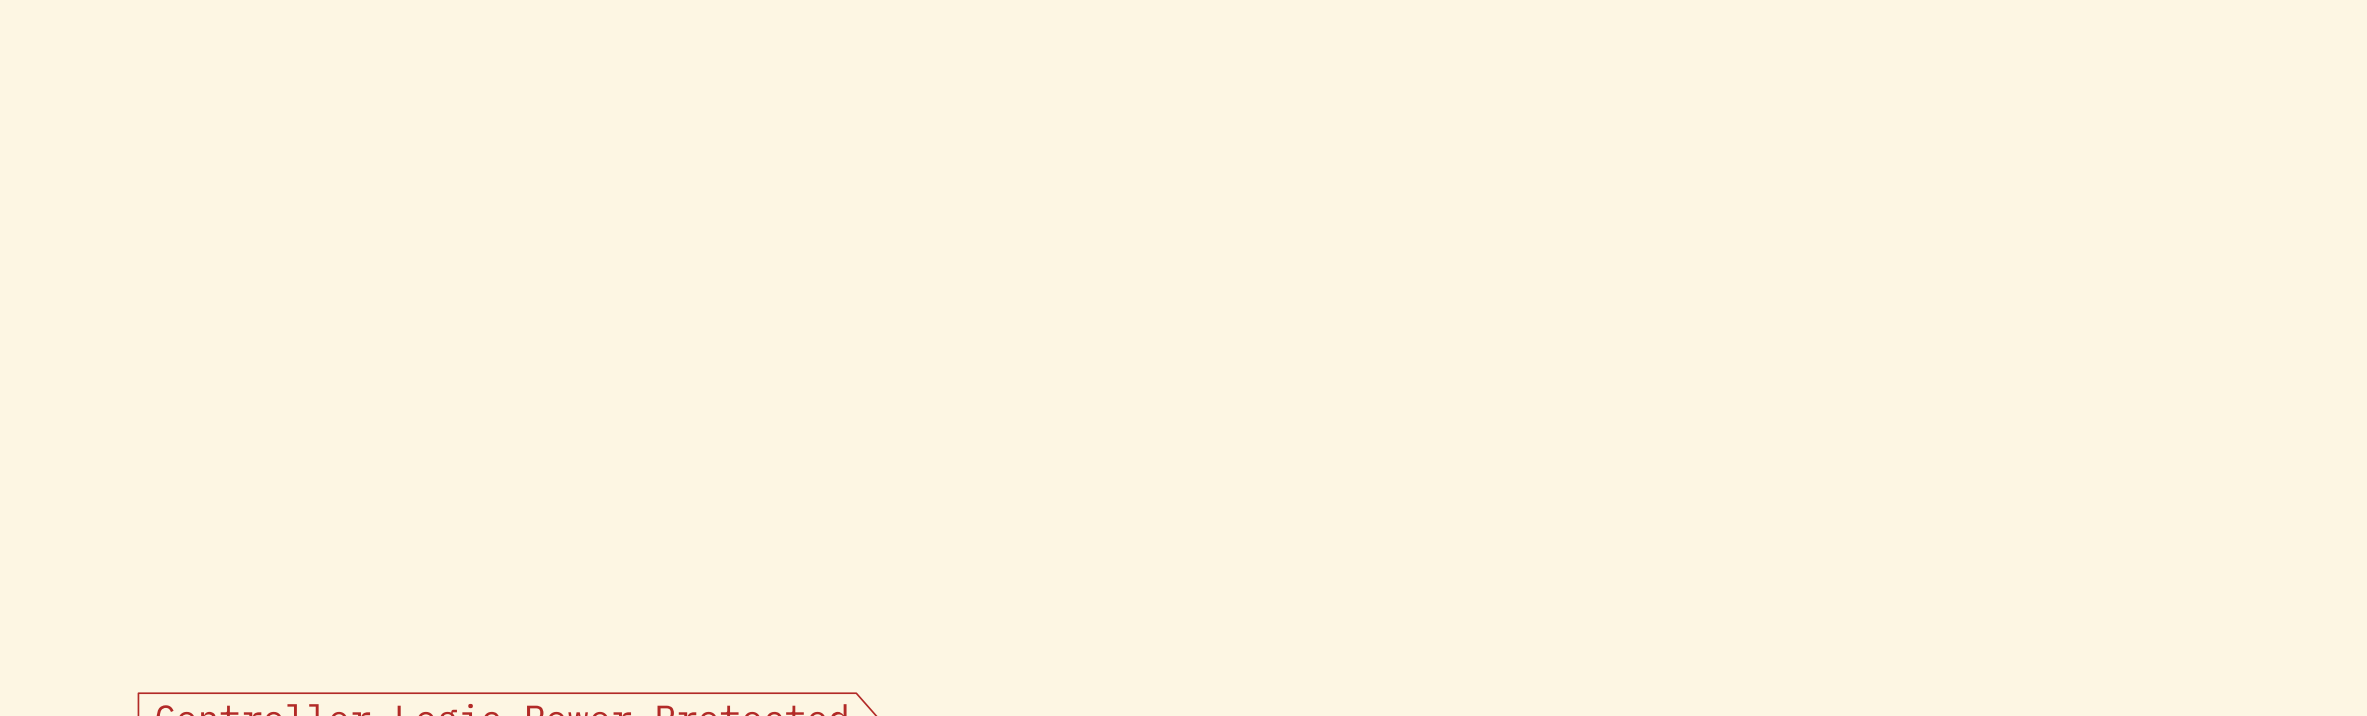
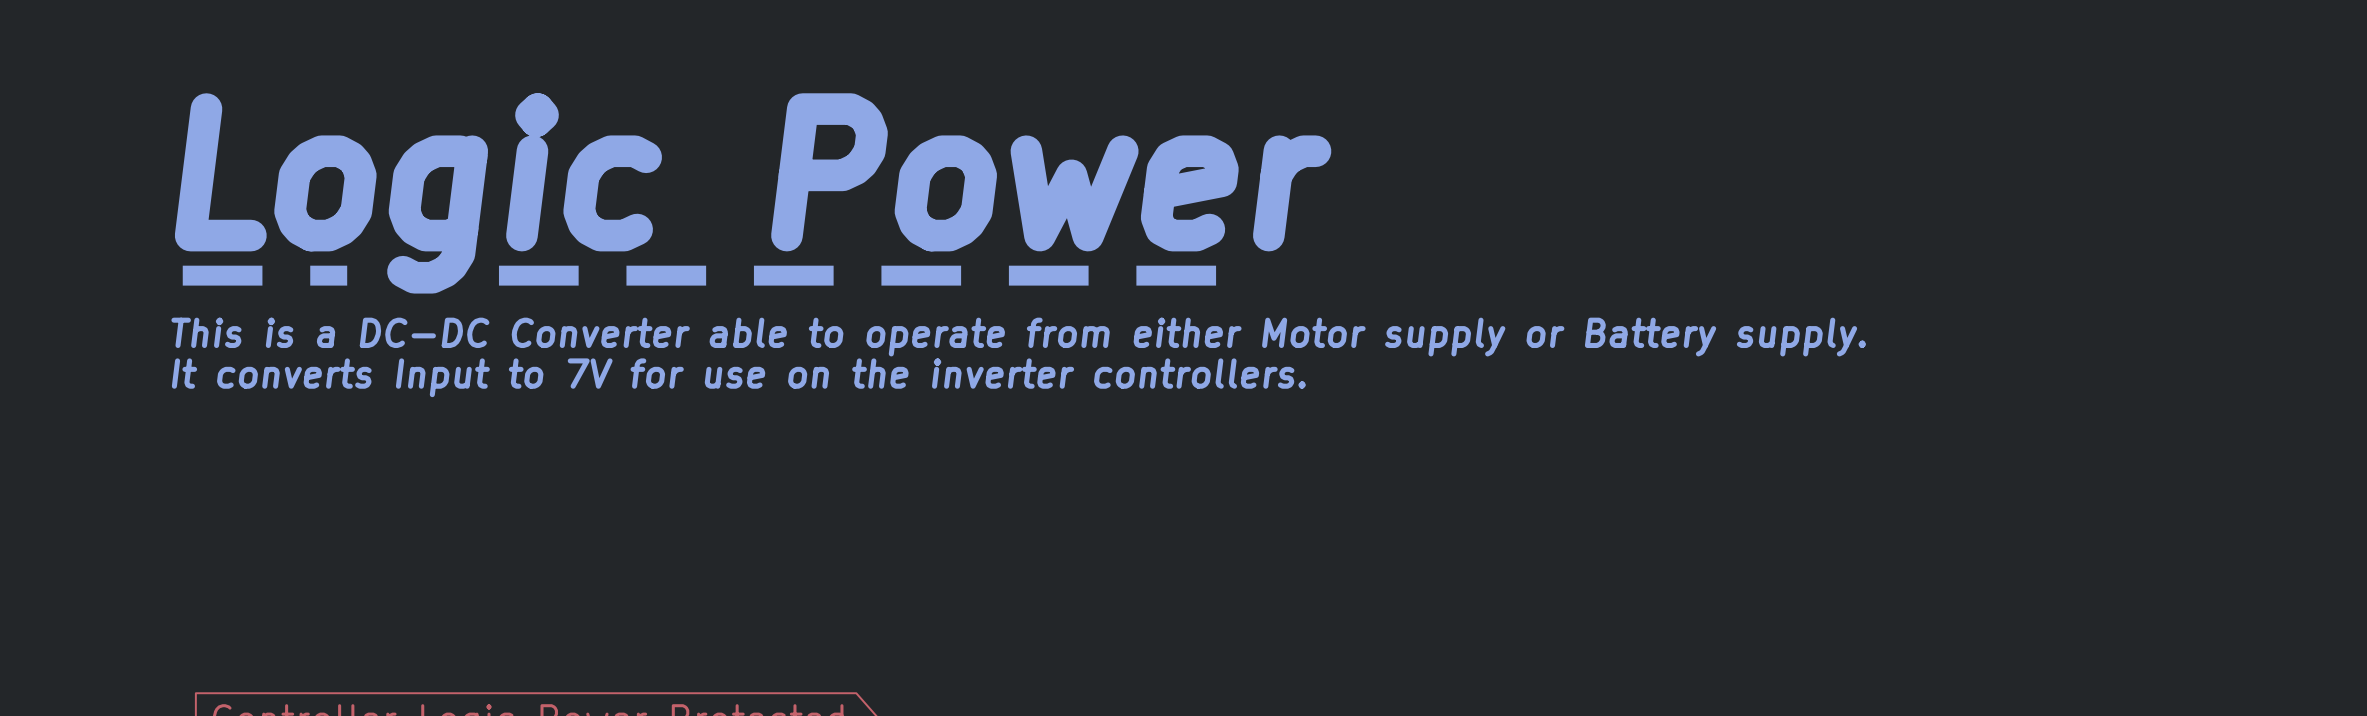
text: none -> Logic Power (753, 193)
line: none -> (182, 275) (347, 275)
line: none -> (498, 275) (1257, 275)
text: none -> This is a DC-DC Converter able to operate from either Motor supply or Battery supply. (1018, 337)
text: none -> It converts Input to 7V for use on the inverter controllers. (738, 377)

